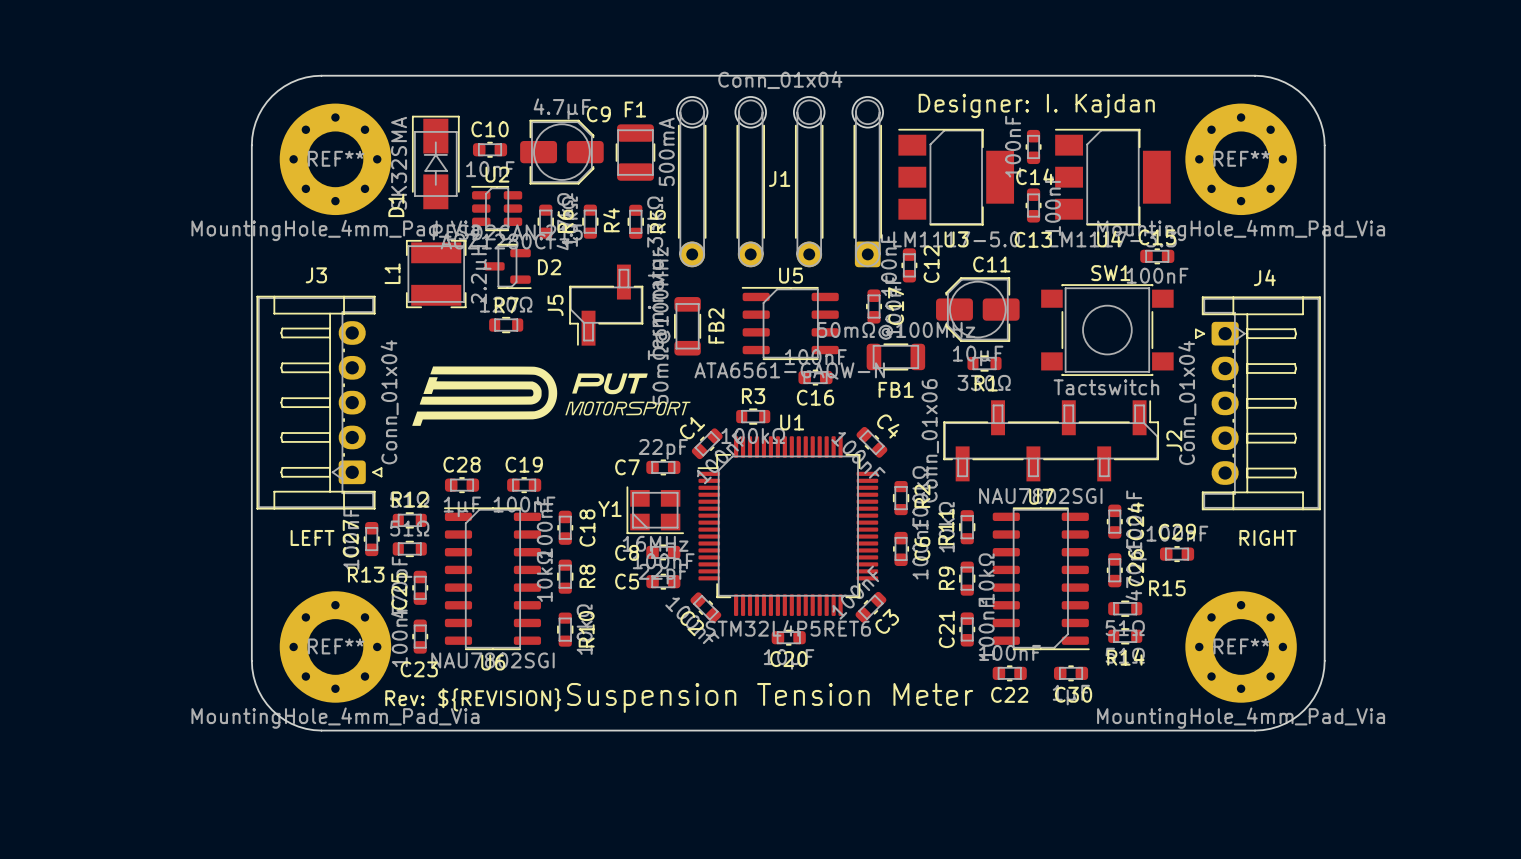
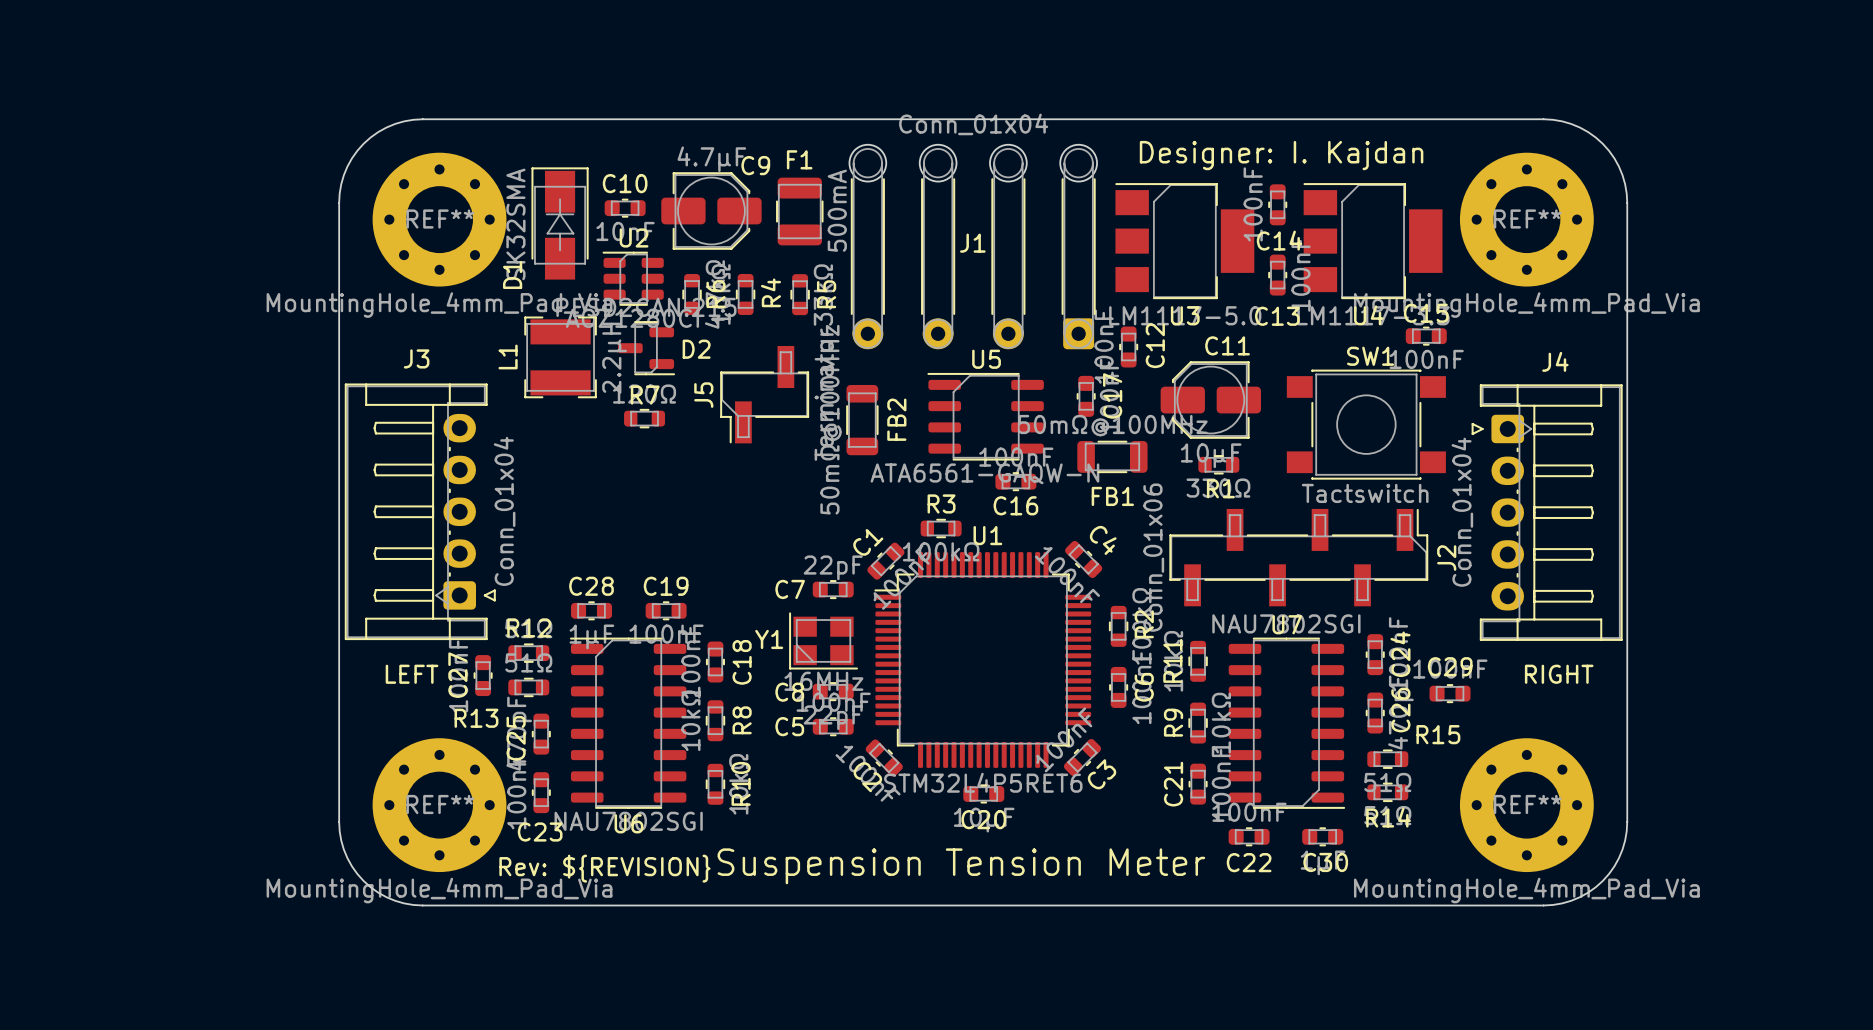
drawing: [412, 366, 691, 426] -> none

